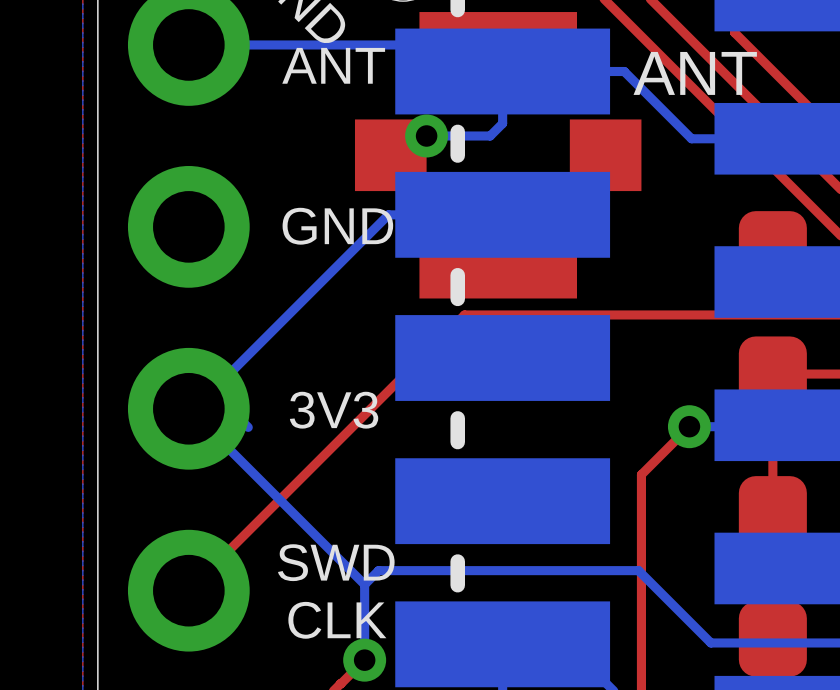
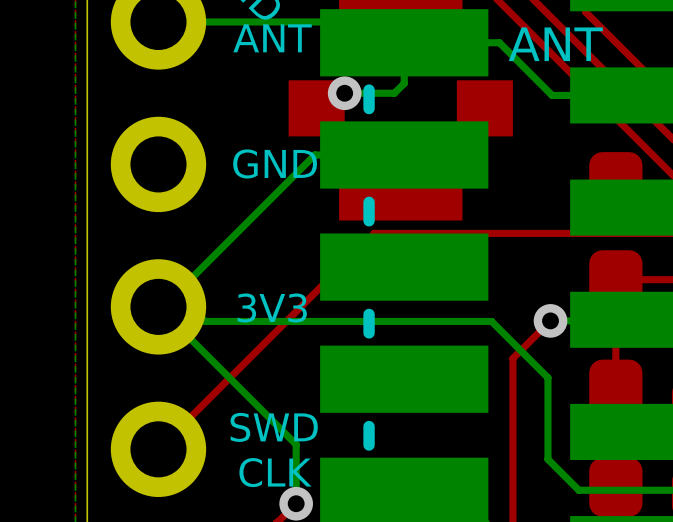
bottom track: (364, 584) (378, 570) (638, 570) (710, 642) (725, 642) -> (205, 321) (491, 321) (547, 377) (547, 459) (578, 490)

